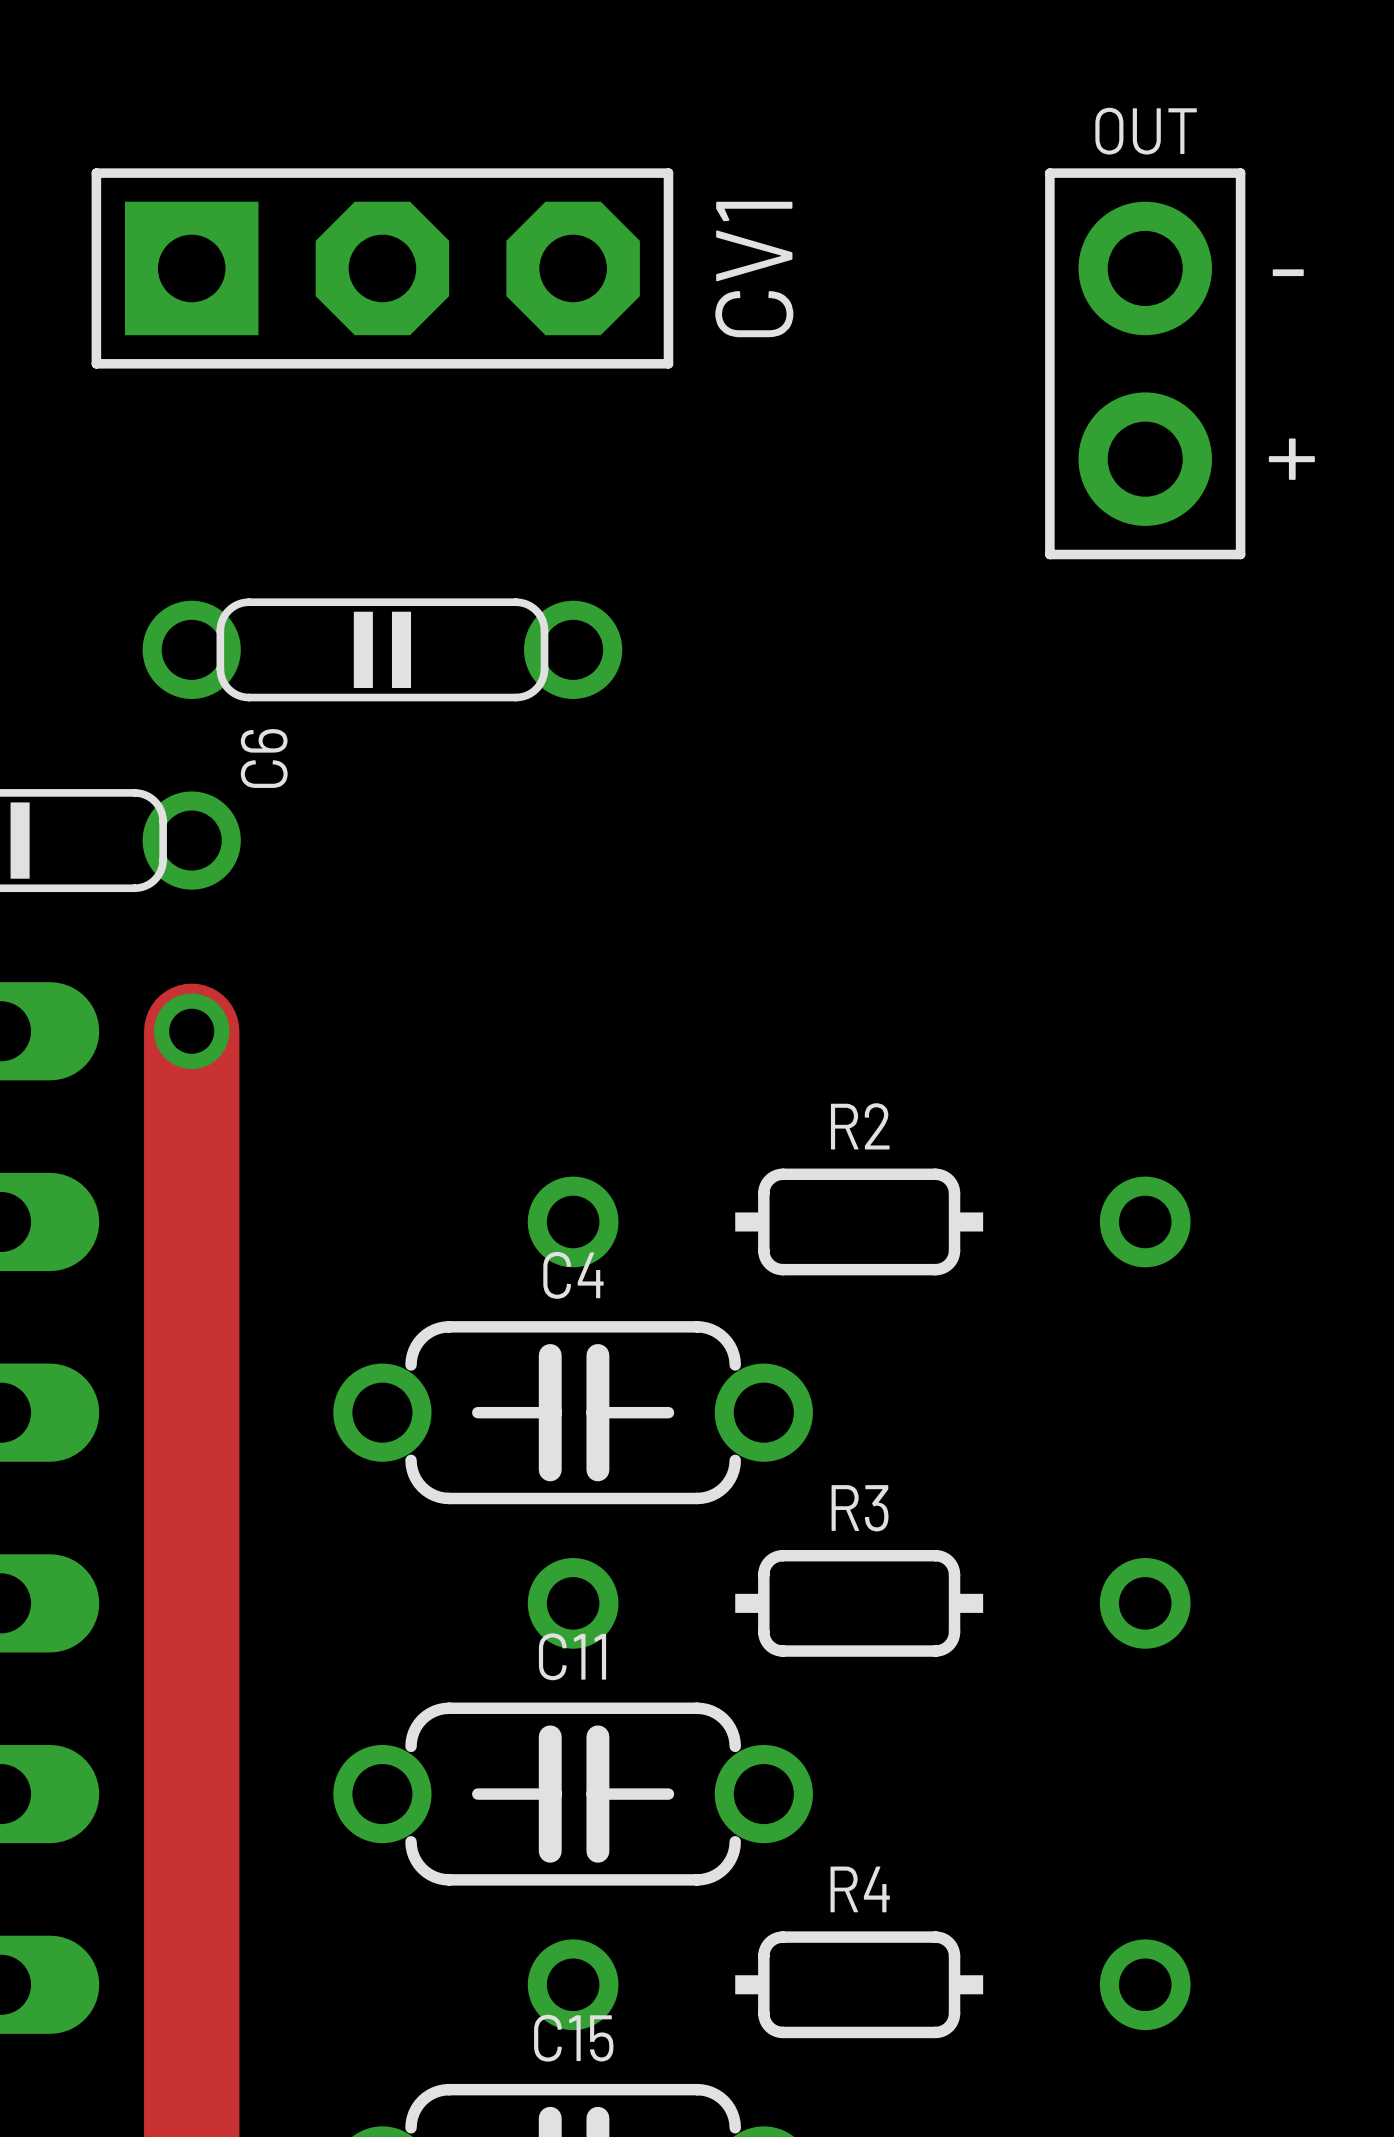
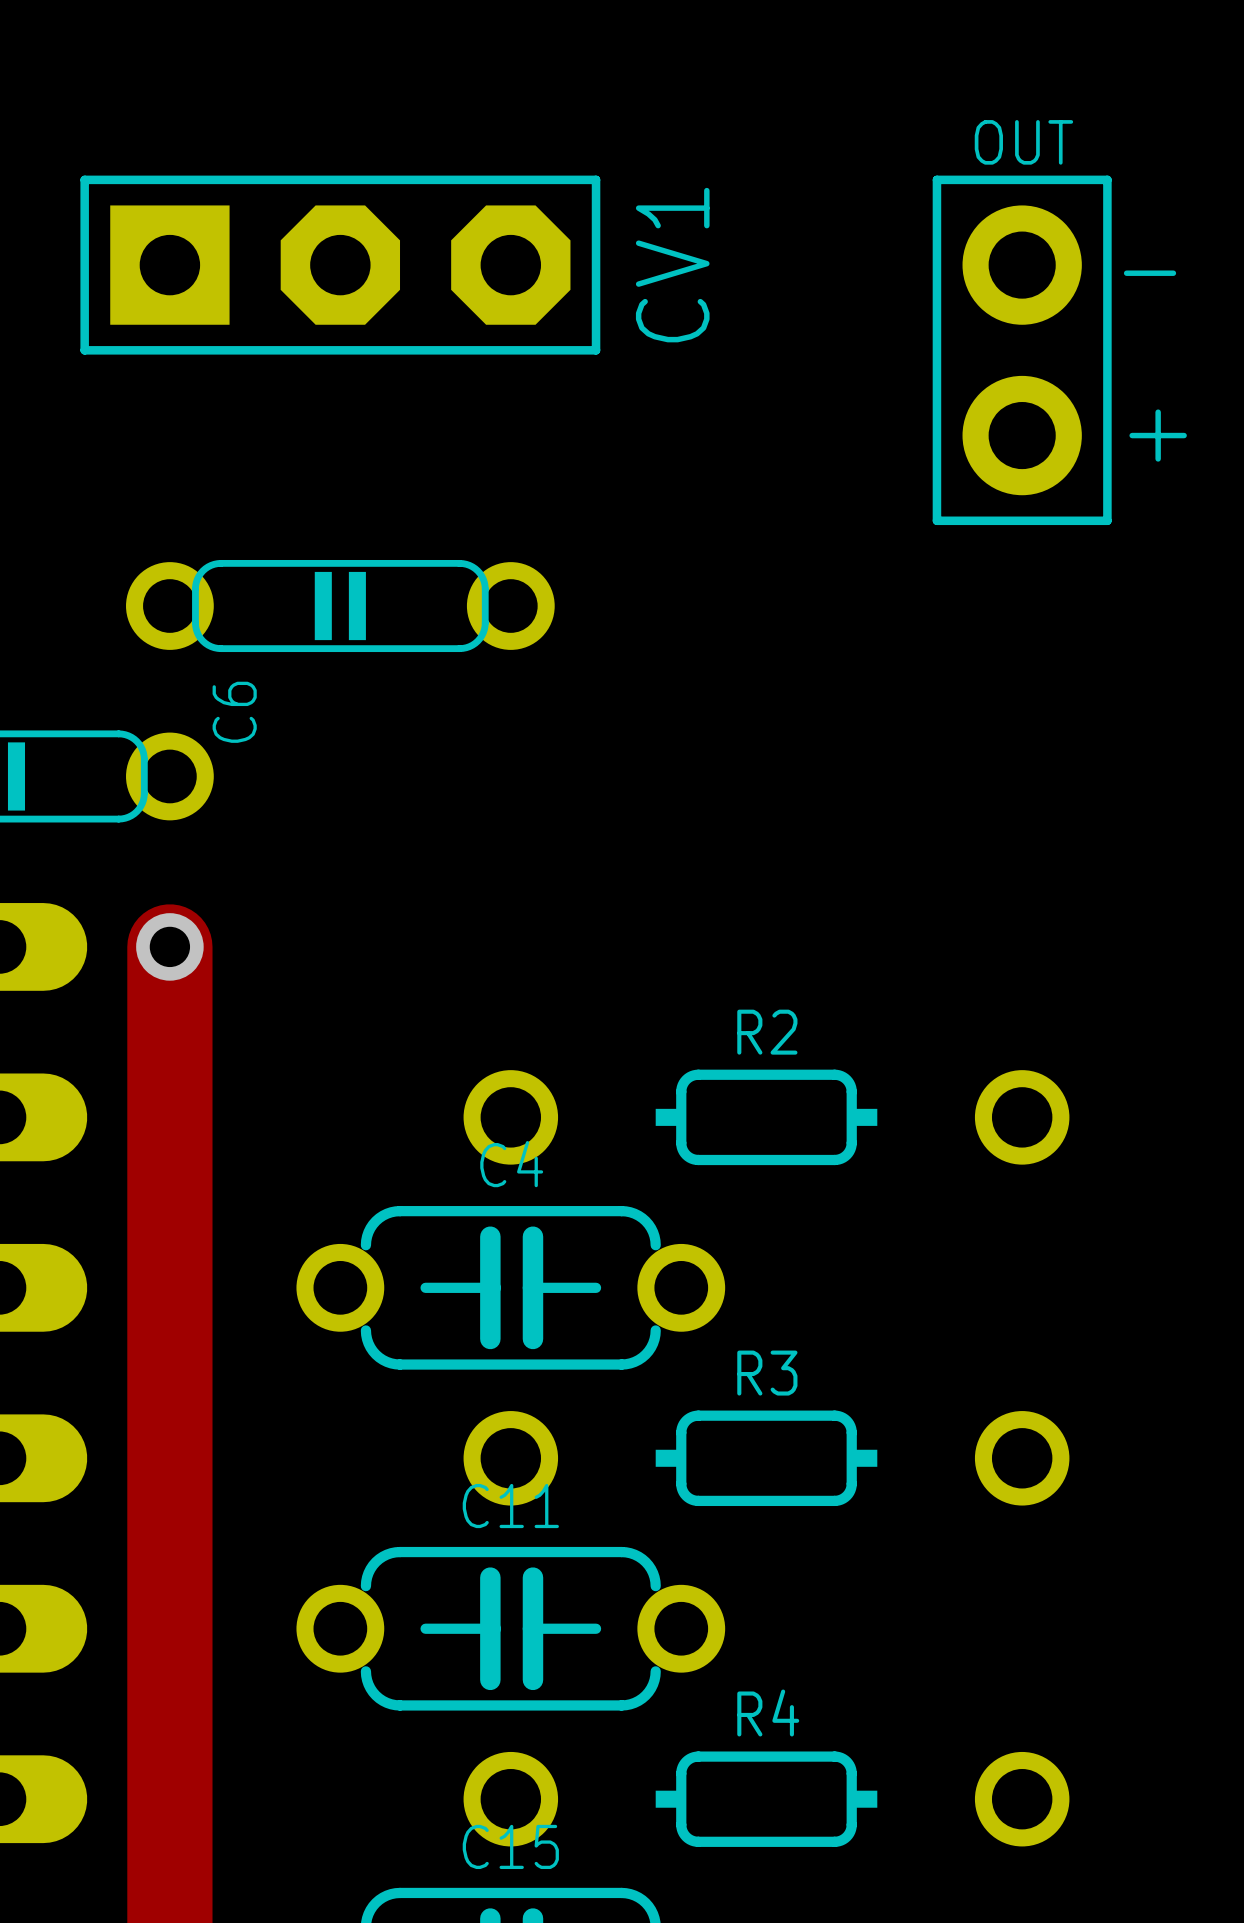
R2 footprint: [527, 1168, 1191, 1276] -> [463, 1069, 1070, 1166]
R3 footprint: [527, 1549, 1191, 1657] -> [463, 1410, 1070, 1507]
R4 footprint: [527, 1931, 1191, 2039] -> [463, 1751, 1070, 1847]

